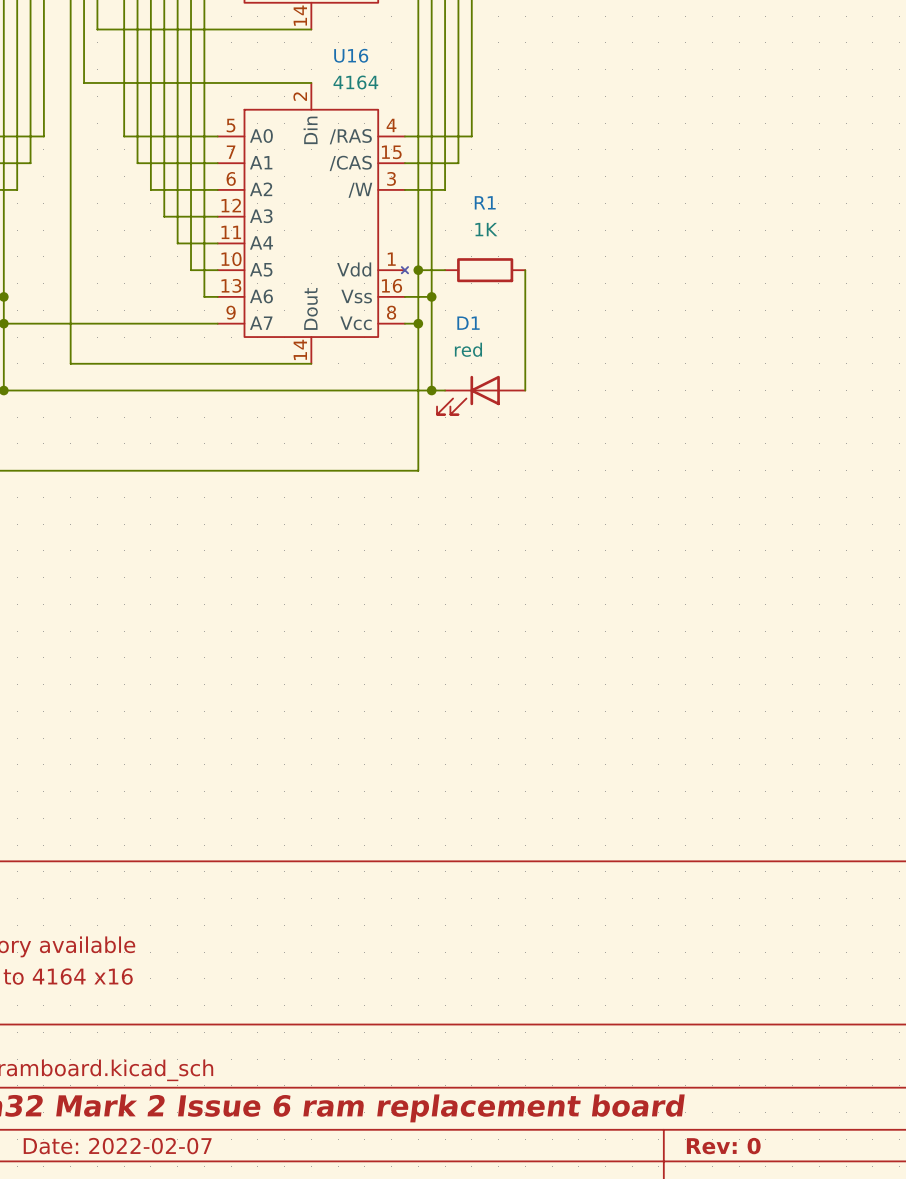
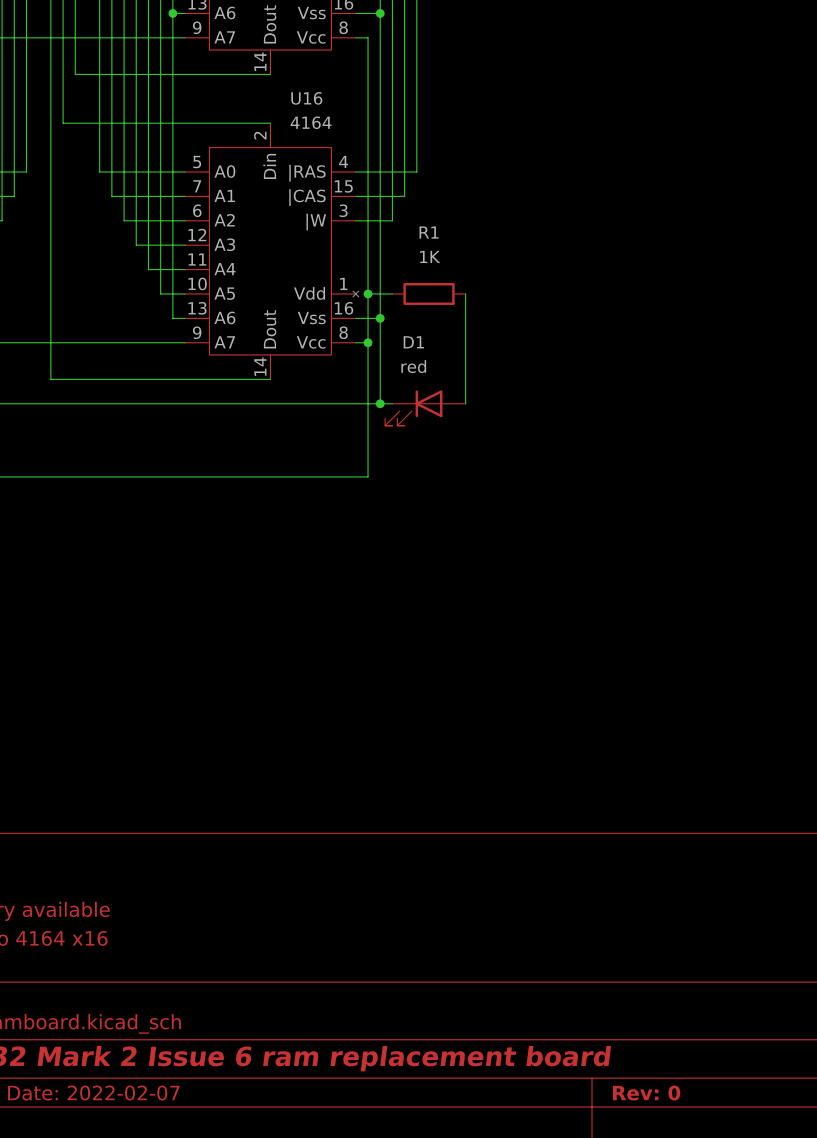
U16 pin name: /RAS (350, 136) -> |RAS (307, 173)
U16 pin name: /CAS (350, 163) -> |CAS (307, 197)
U16 pin name: /W (360, 190) -> |W (316, 222)

